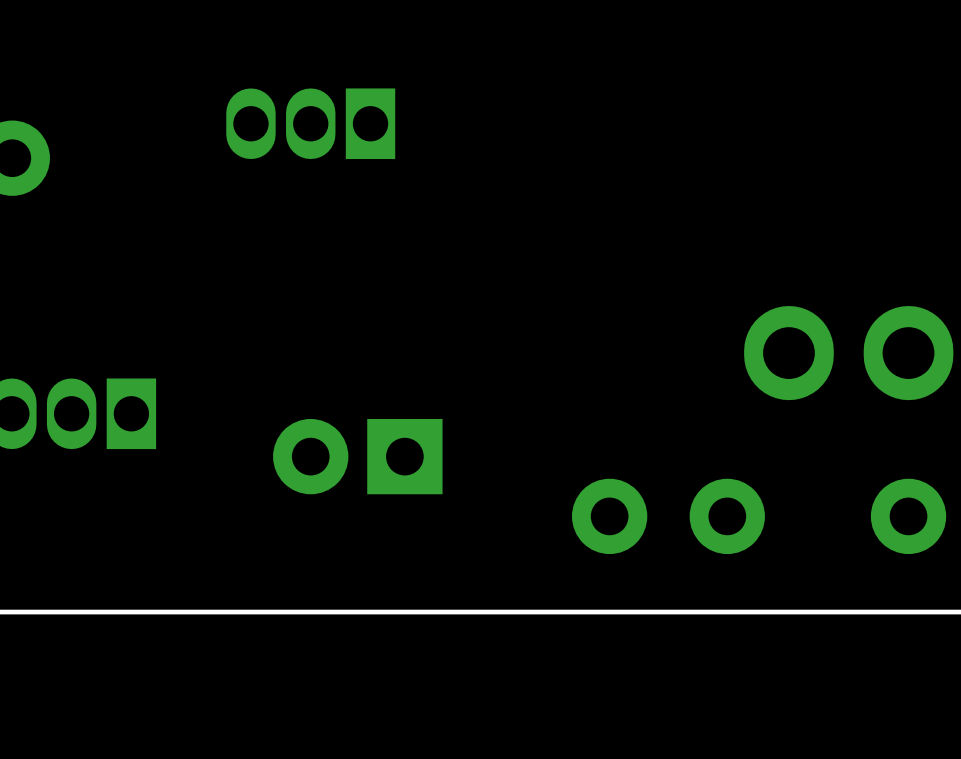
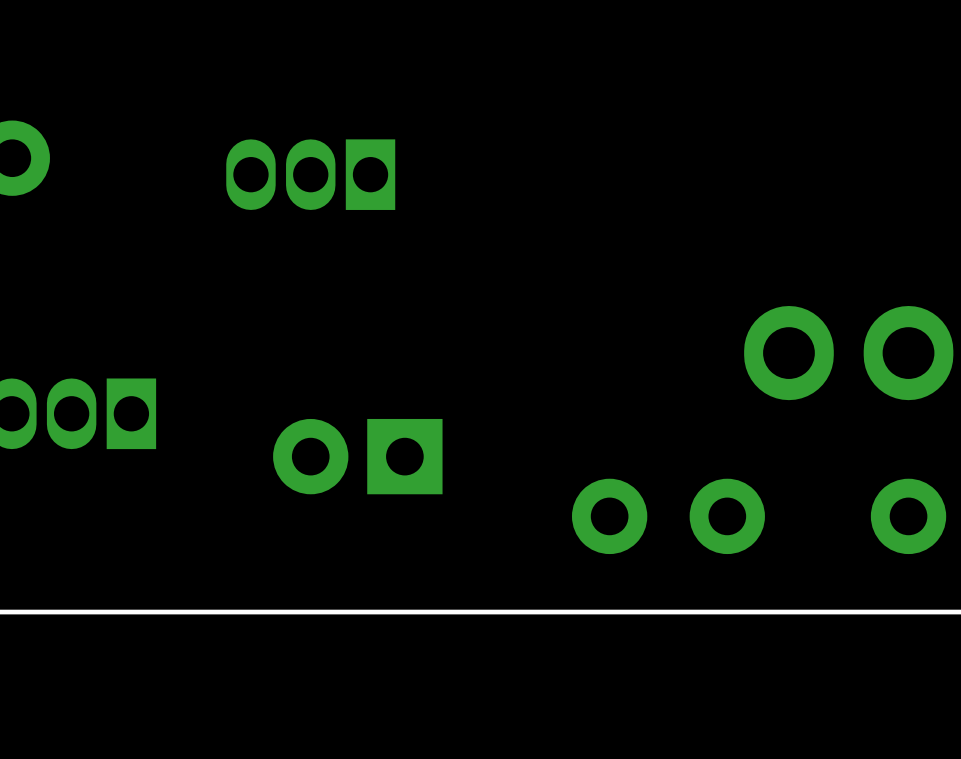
part position: (310, 123) -> (310, 174)

